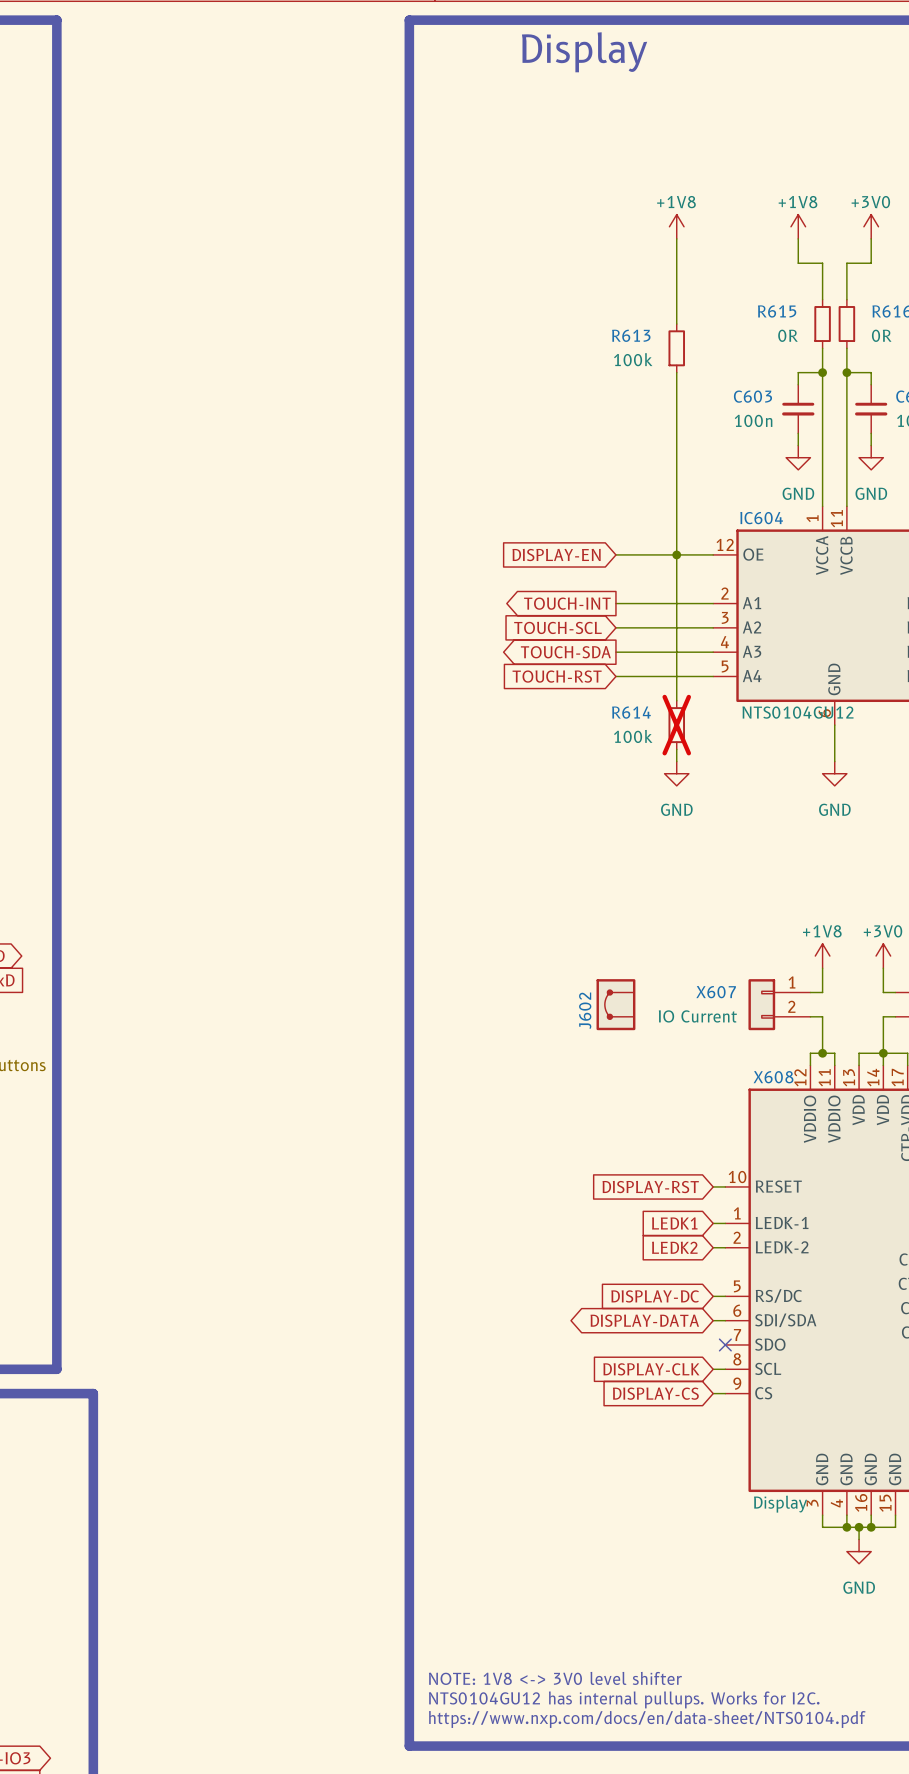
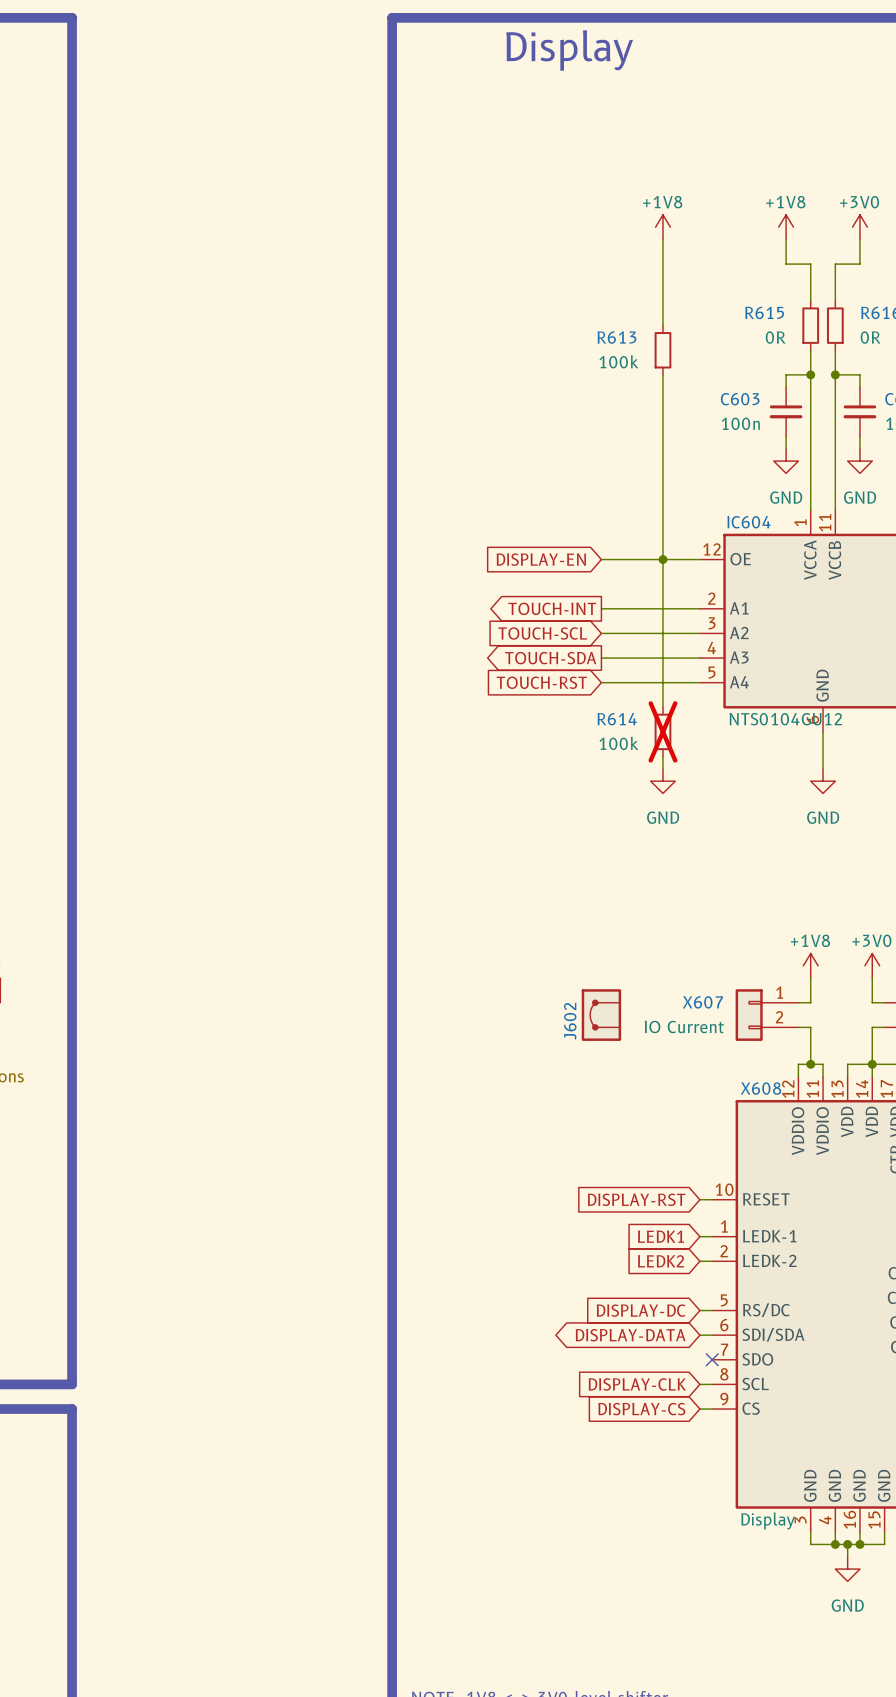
line: (56, 20) (56, 1369) -> (35, 17) (72, 17) (72, 1384) (35, 1384)

